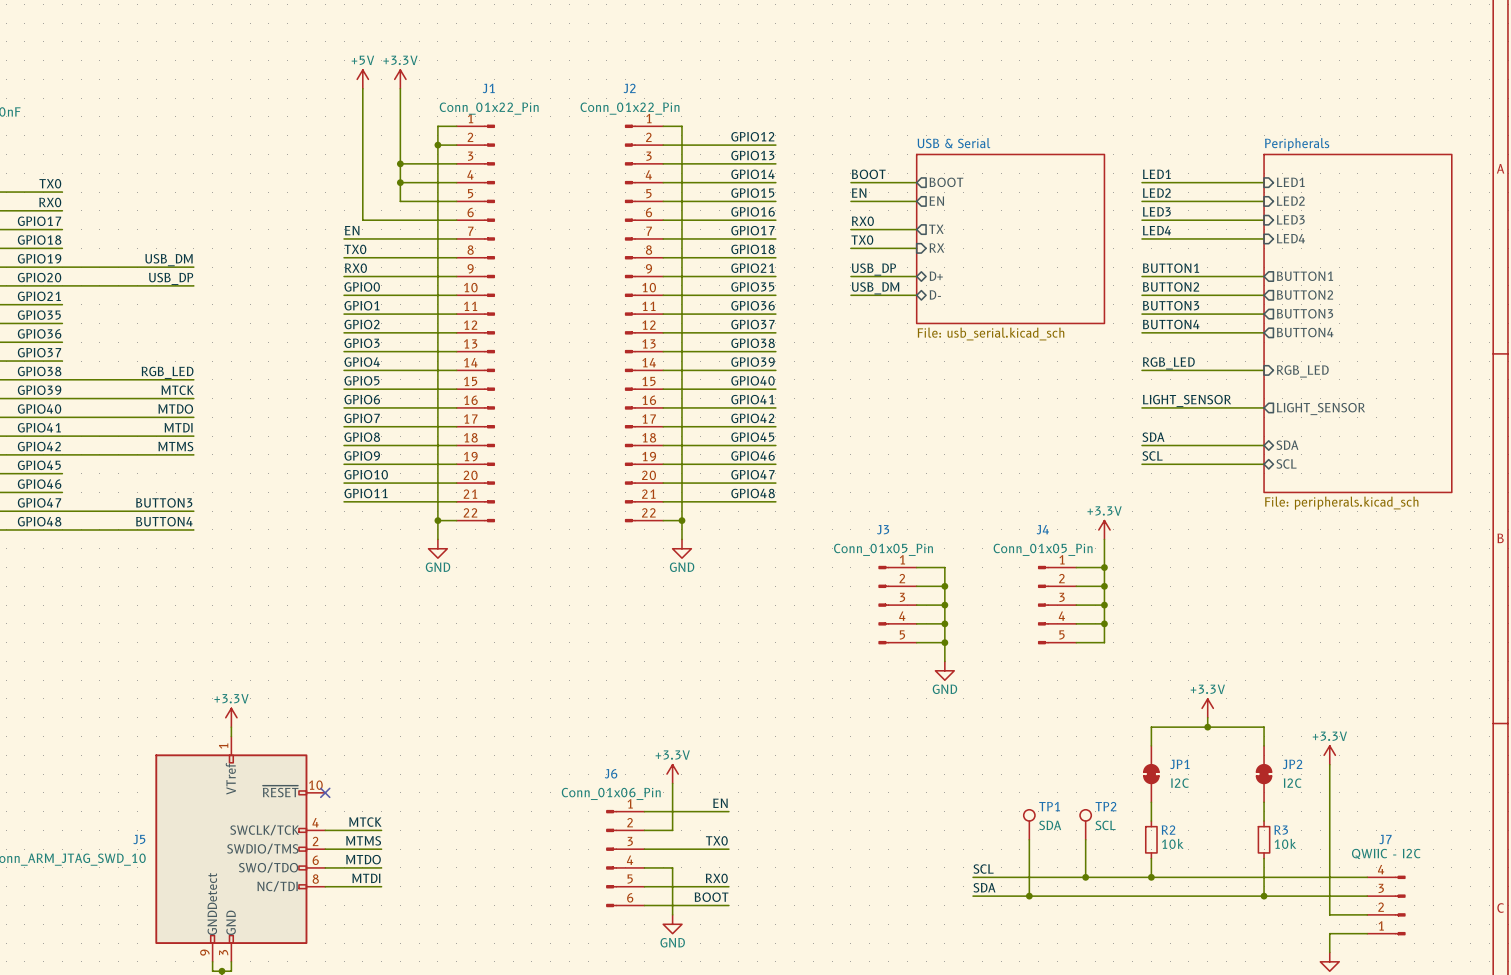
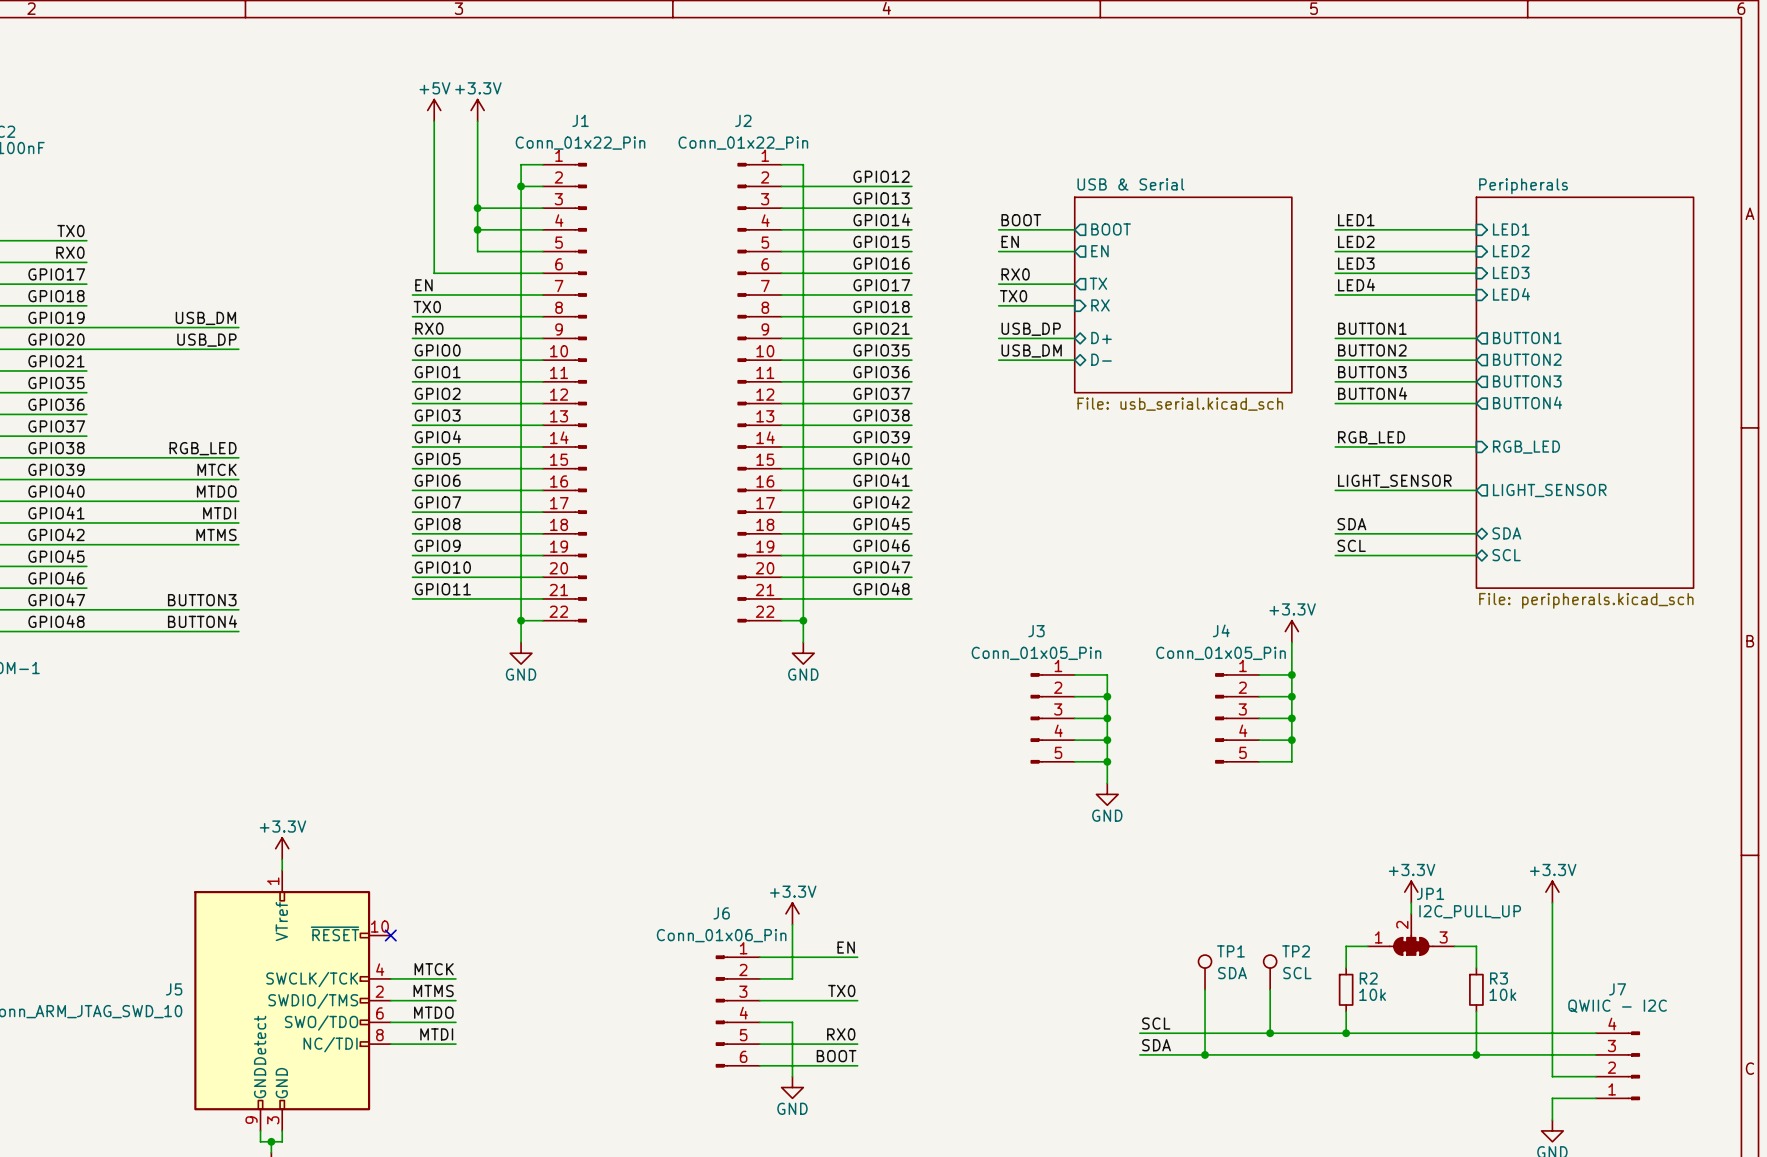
power symbol position: +3.3V (1207, 708) -> +3.3V (1411, 892)
wire: (1207, 717) (1207, 727) -> (1411, 902) (1411, 913)
junction: (1207, 727) -> none
JP1 symbol: [1143, 745, 1159, 803] -> [1367, 913, 1455, 956]
wire: (1151, 745) (1151, 727) (1264, 727) (1264, 745) -> none
JP1 name position: JP1 (1179, 764) -> JP1 (1430, 893)
JP2: I2C (1264, 774) -> none
JP1 value: I2C (1179, 783) -> I2C_PULL_UP (1470, 911)
wire: none -> (1346, 946) (1367, 946)
wire: none -> (1454, 946) (1476, 946)

